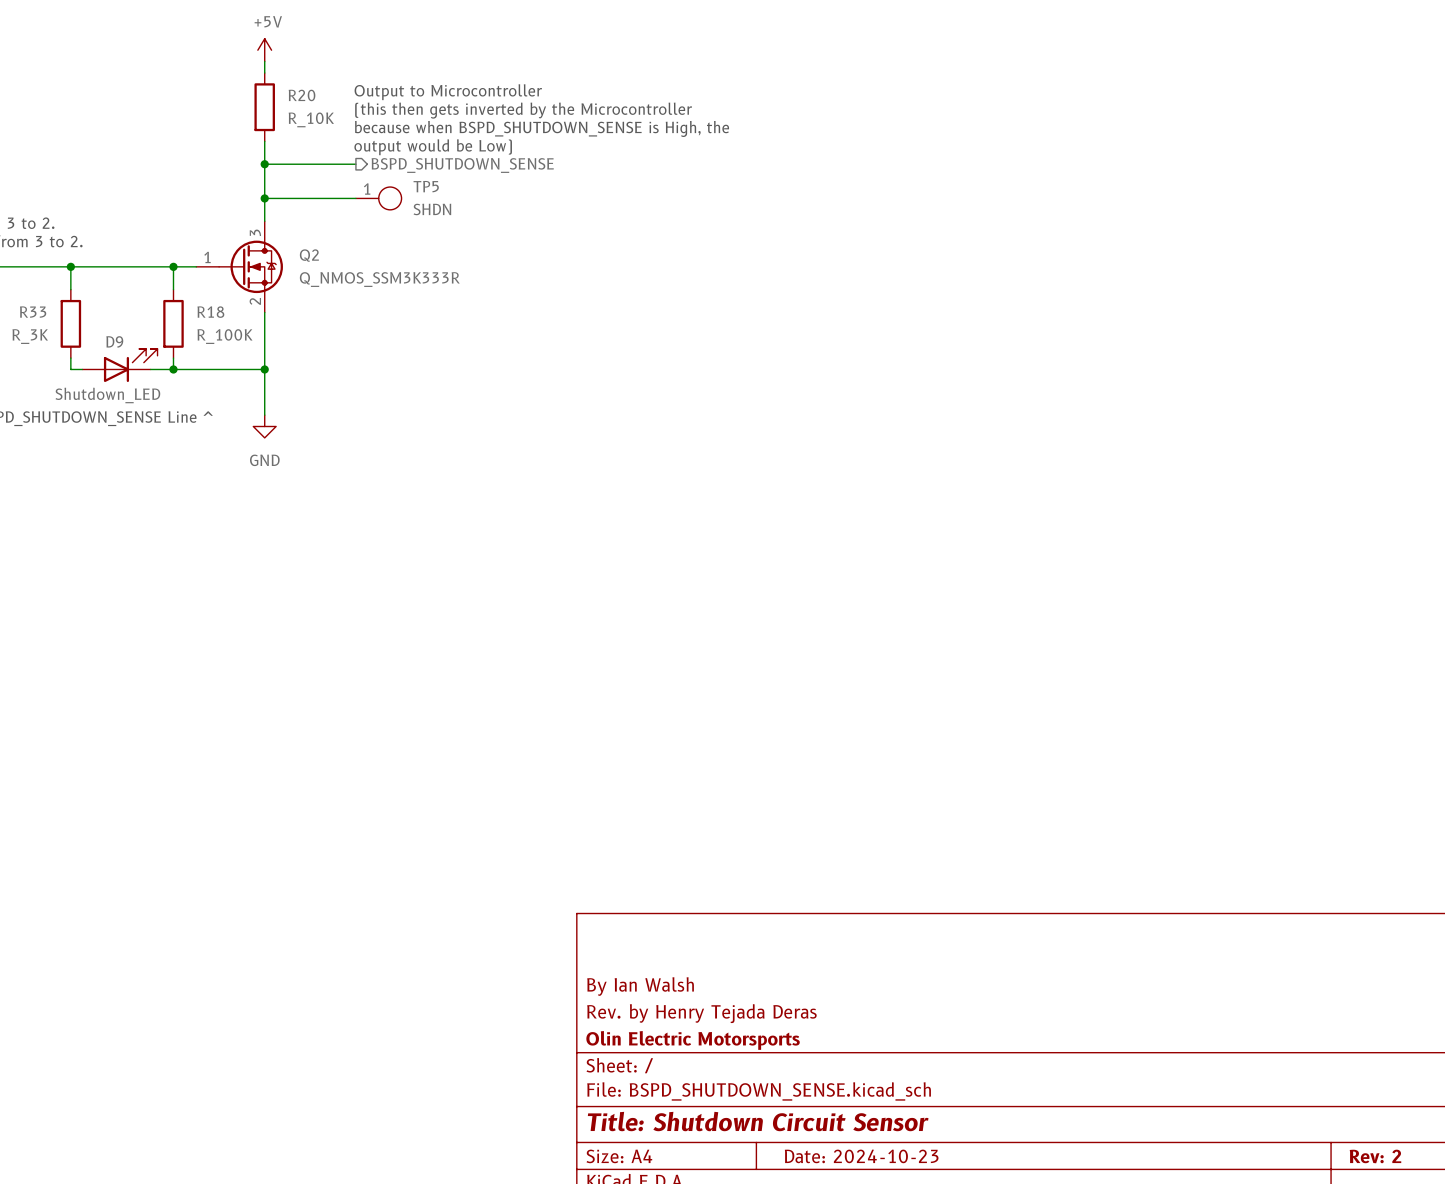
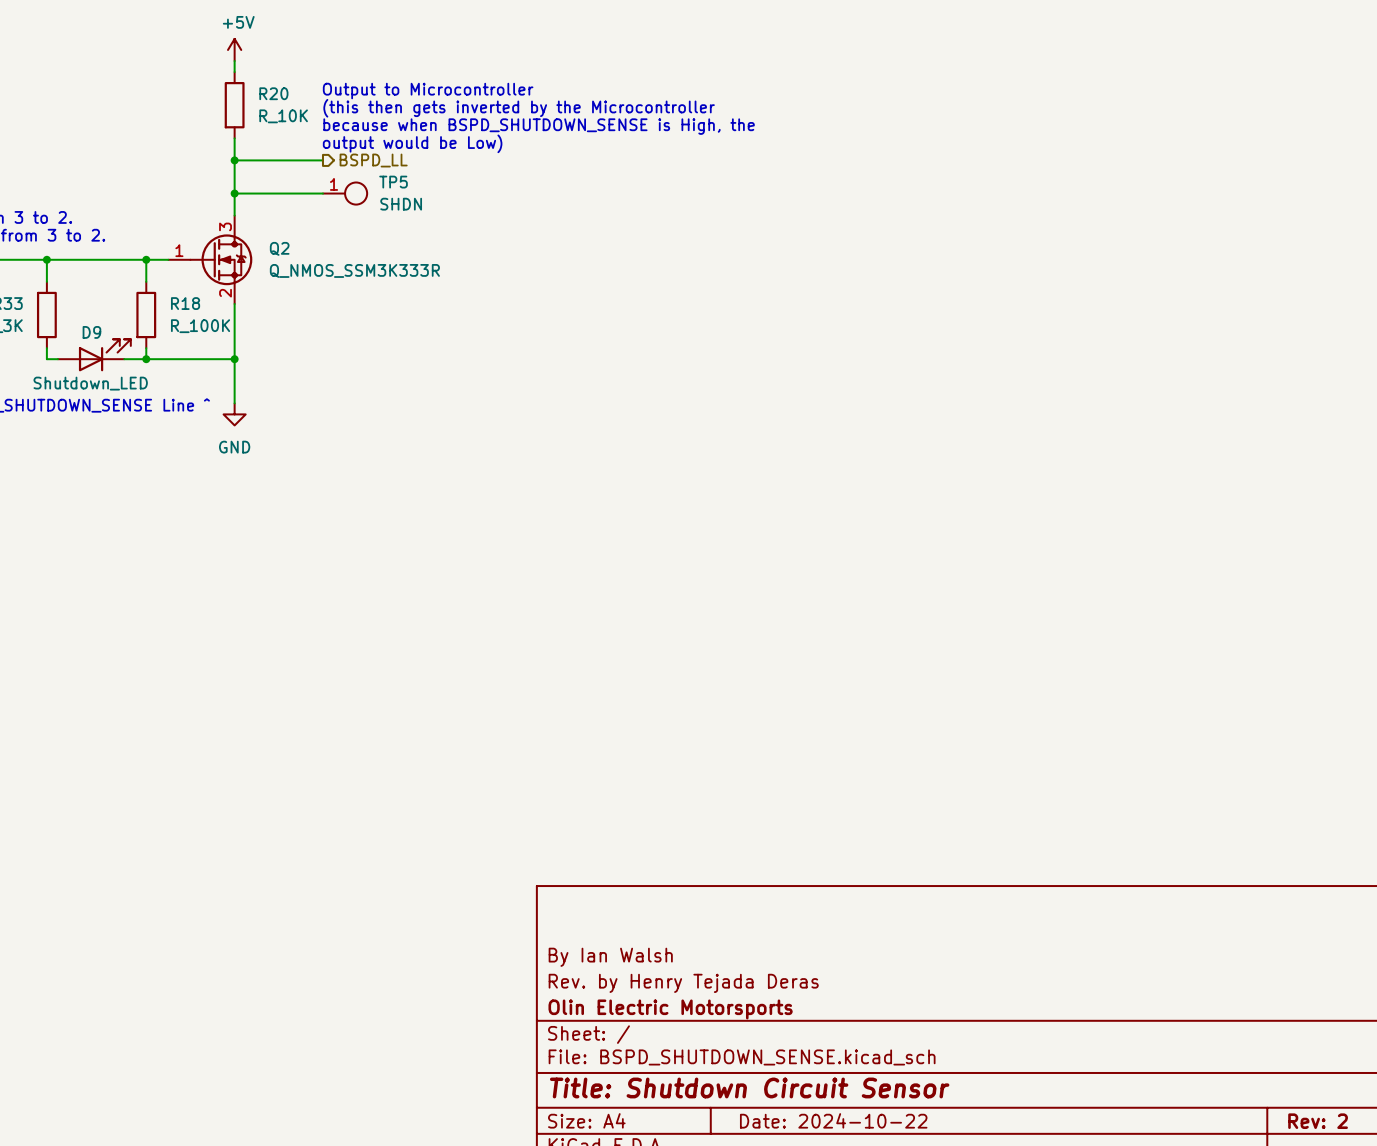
hierarchical label: BSPD_SHUTDOWN_SENSE (462, 165) -> BSPD_LL (373, 160)
title block: Date: 2024-10-23 (861, 1156) -> Date: 2024-10-22 (833, 1120)

